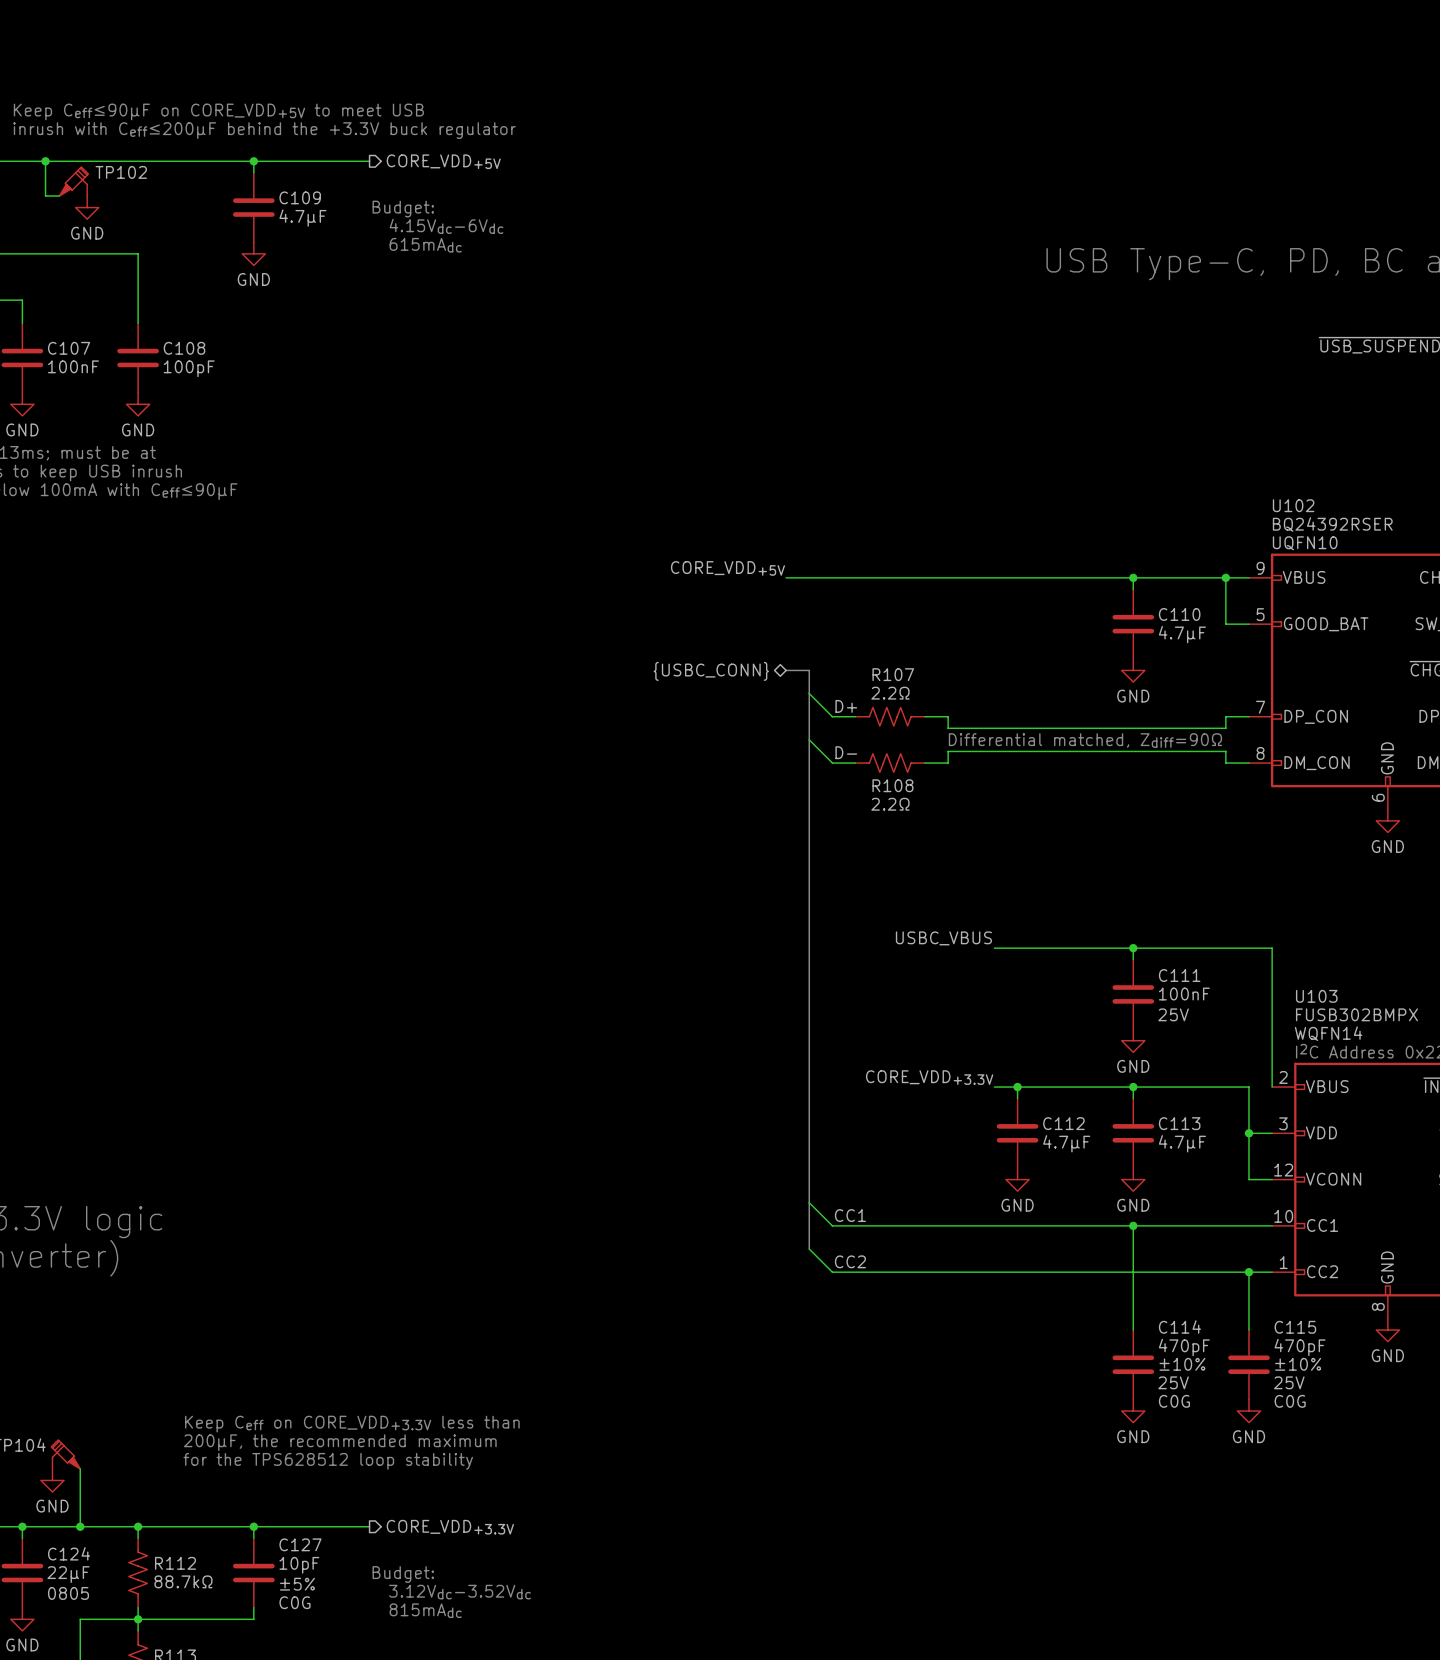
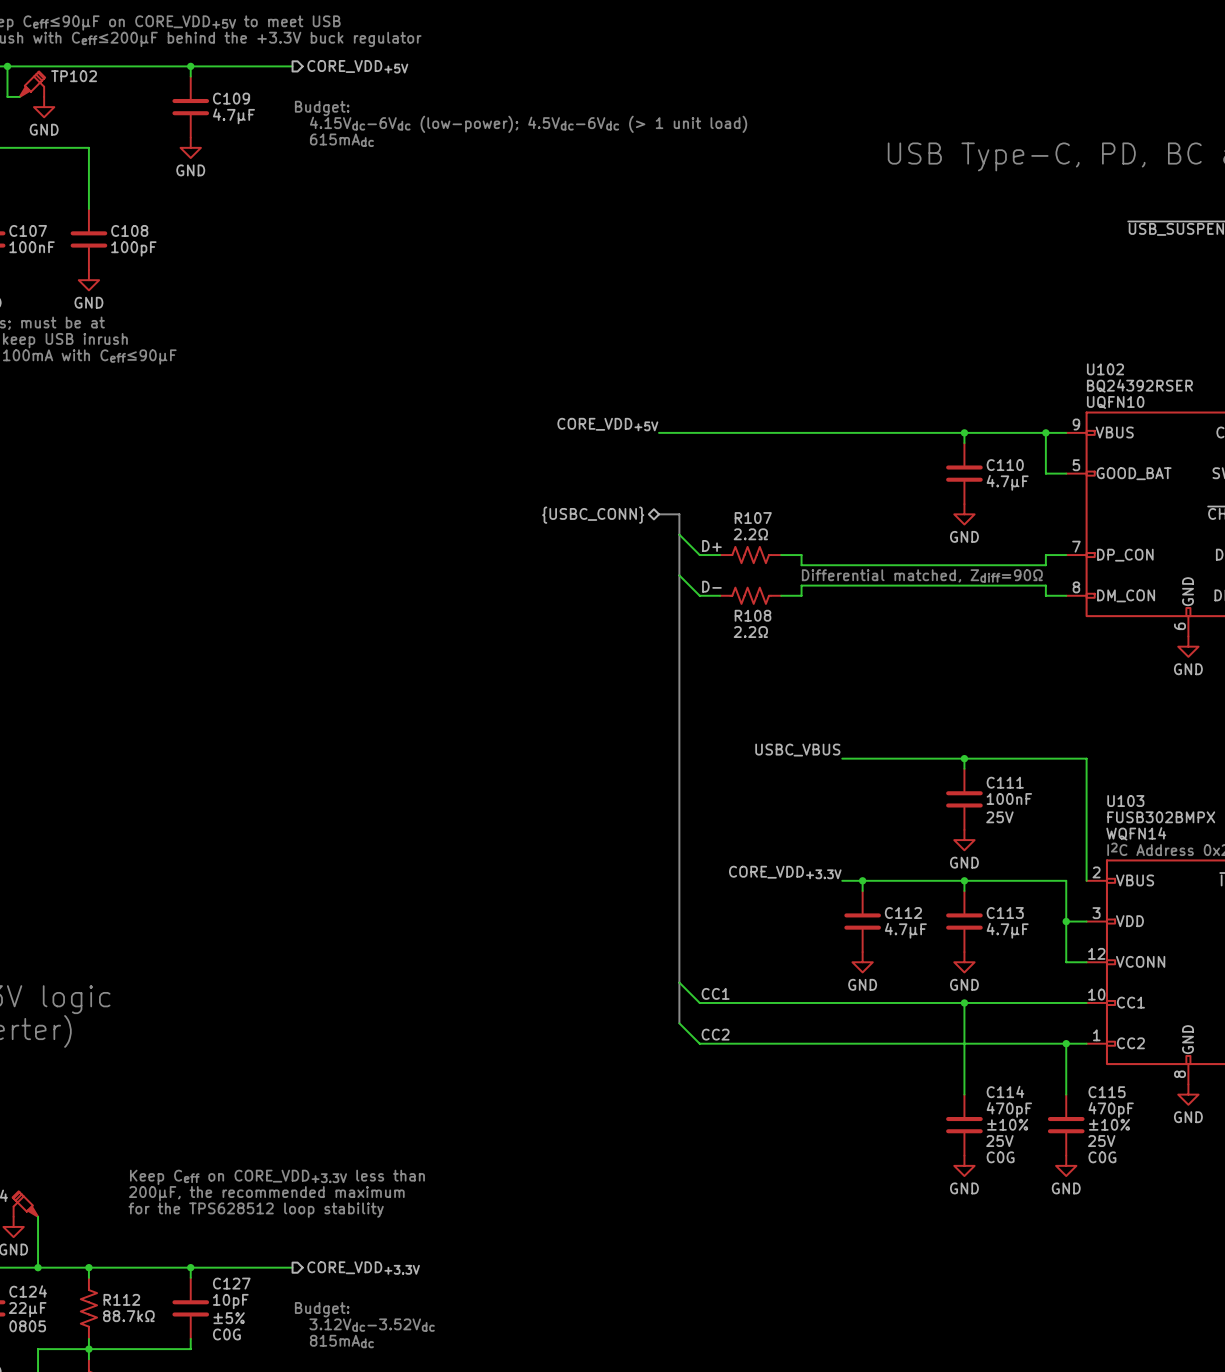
text: 4.15Vdc-6Vdc (446, 226) -> 4.15Vdc-6Vdc (low-power); 4.5Vdc-6Vdc (> 1 unit load) (528, 124)

